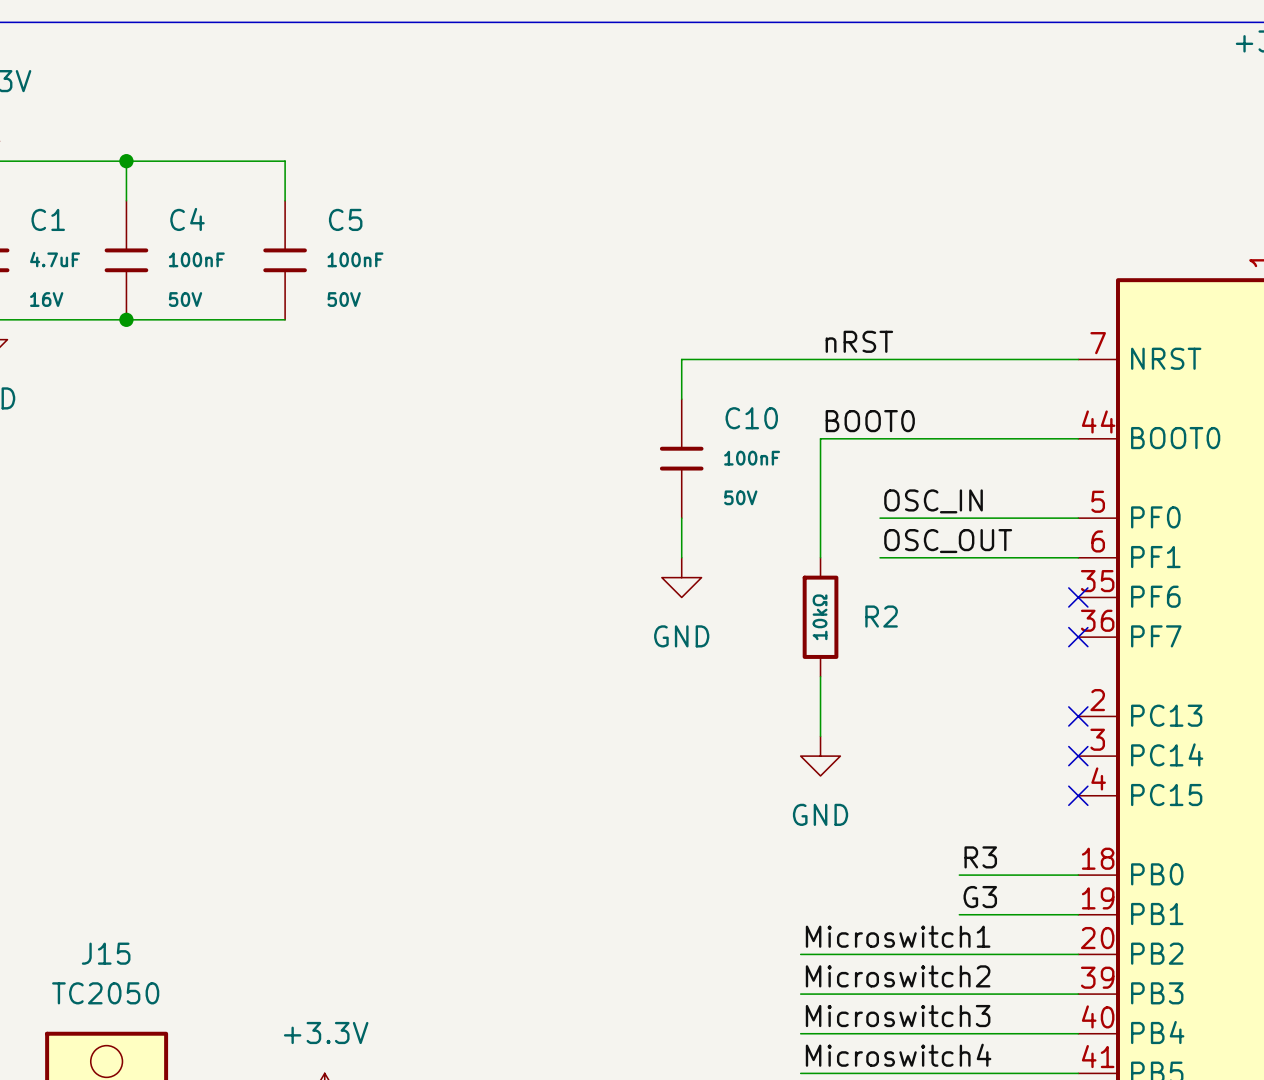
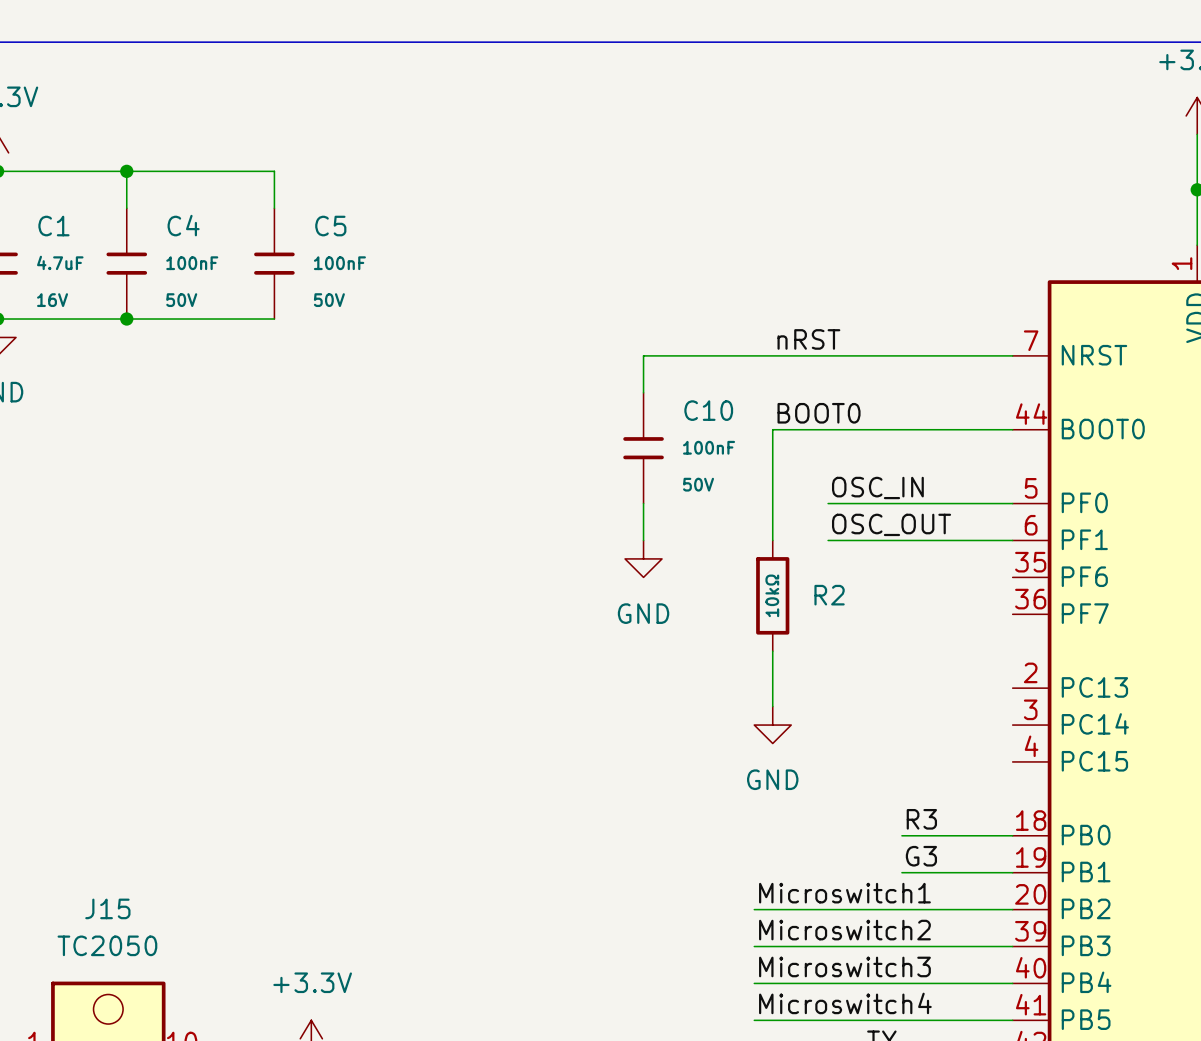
no-connect mark: (1078, 597) -> none
no-connect mark: (1078, 637) -> none
no-connect mark: (1078, 716) -> none
no-connect mark: (1078, 756) -> none
no-connect mark: (1078, 795) -> none

